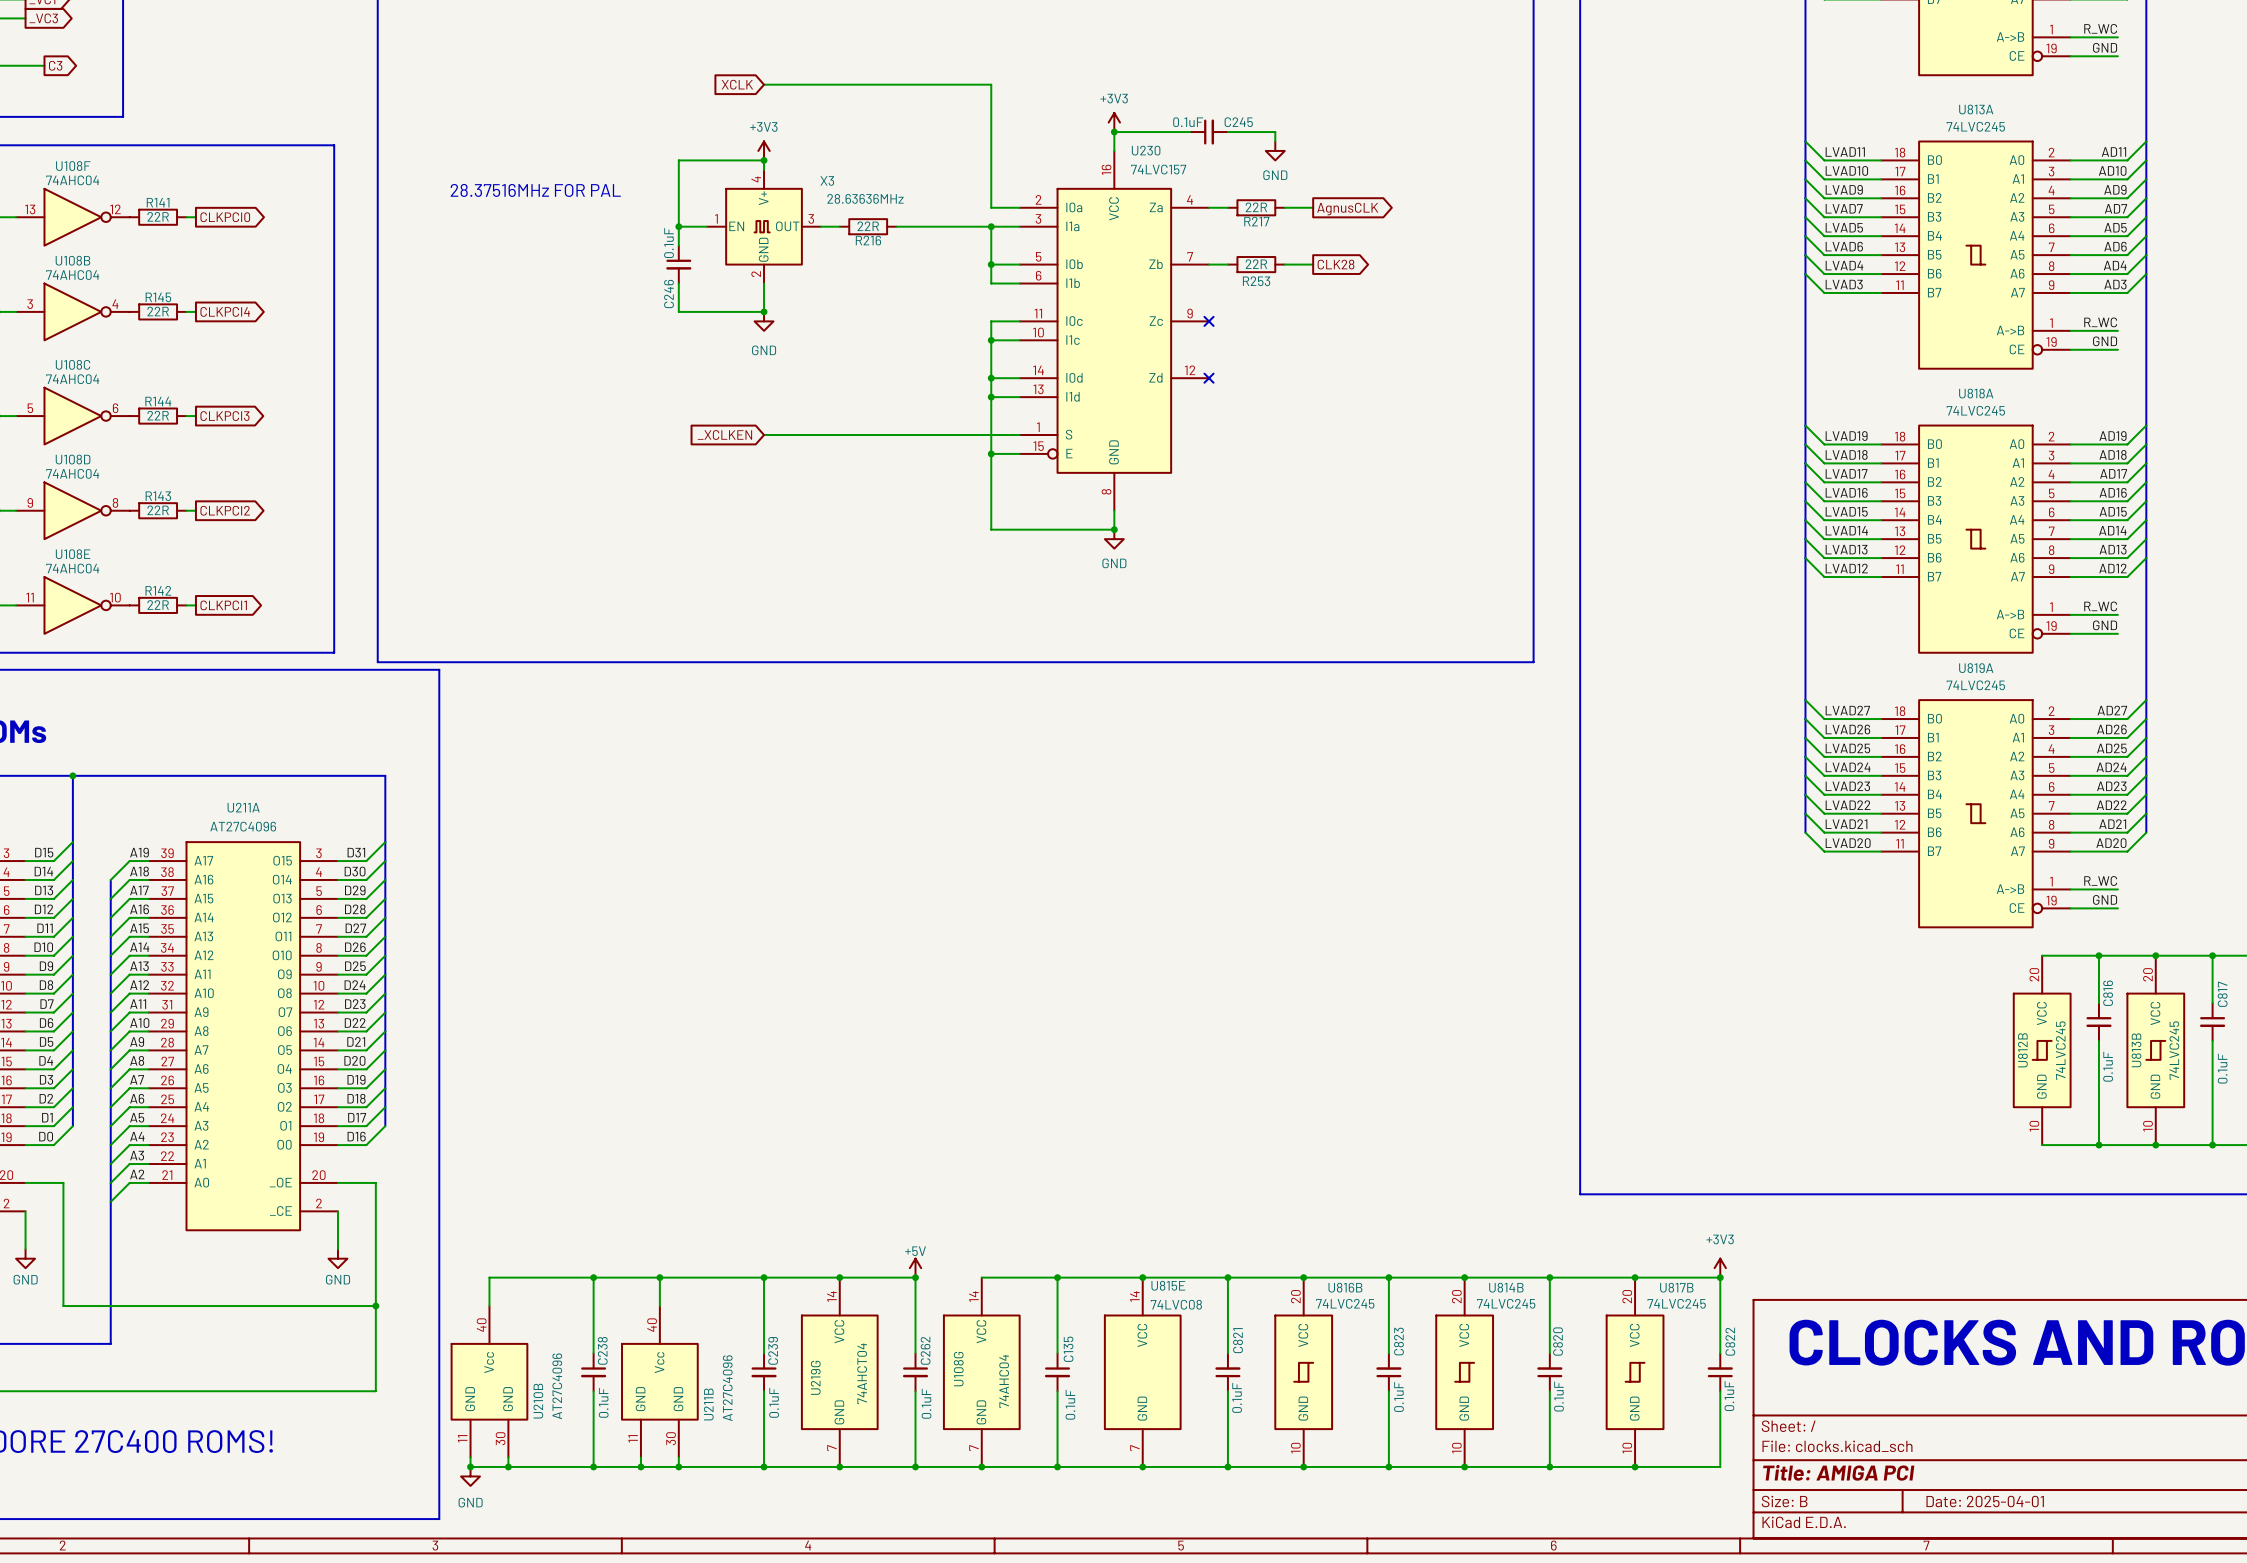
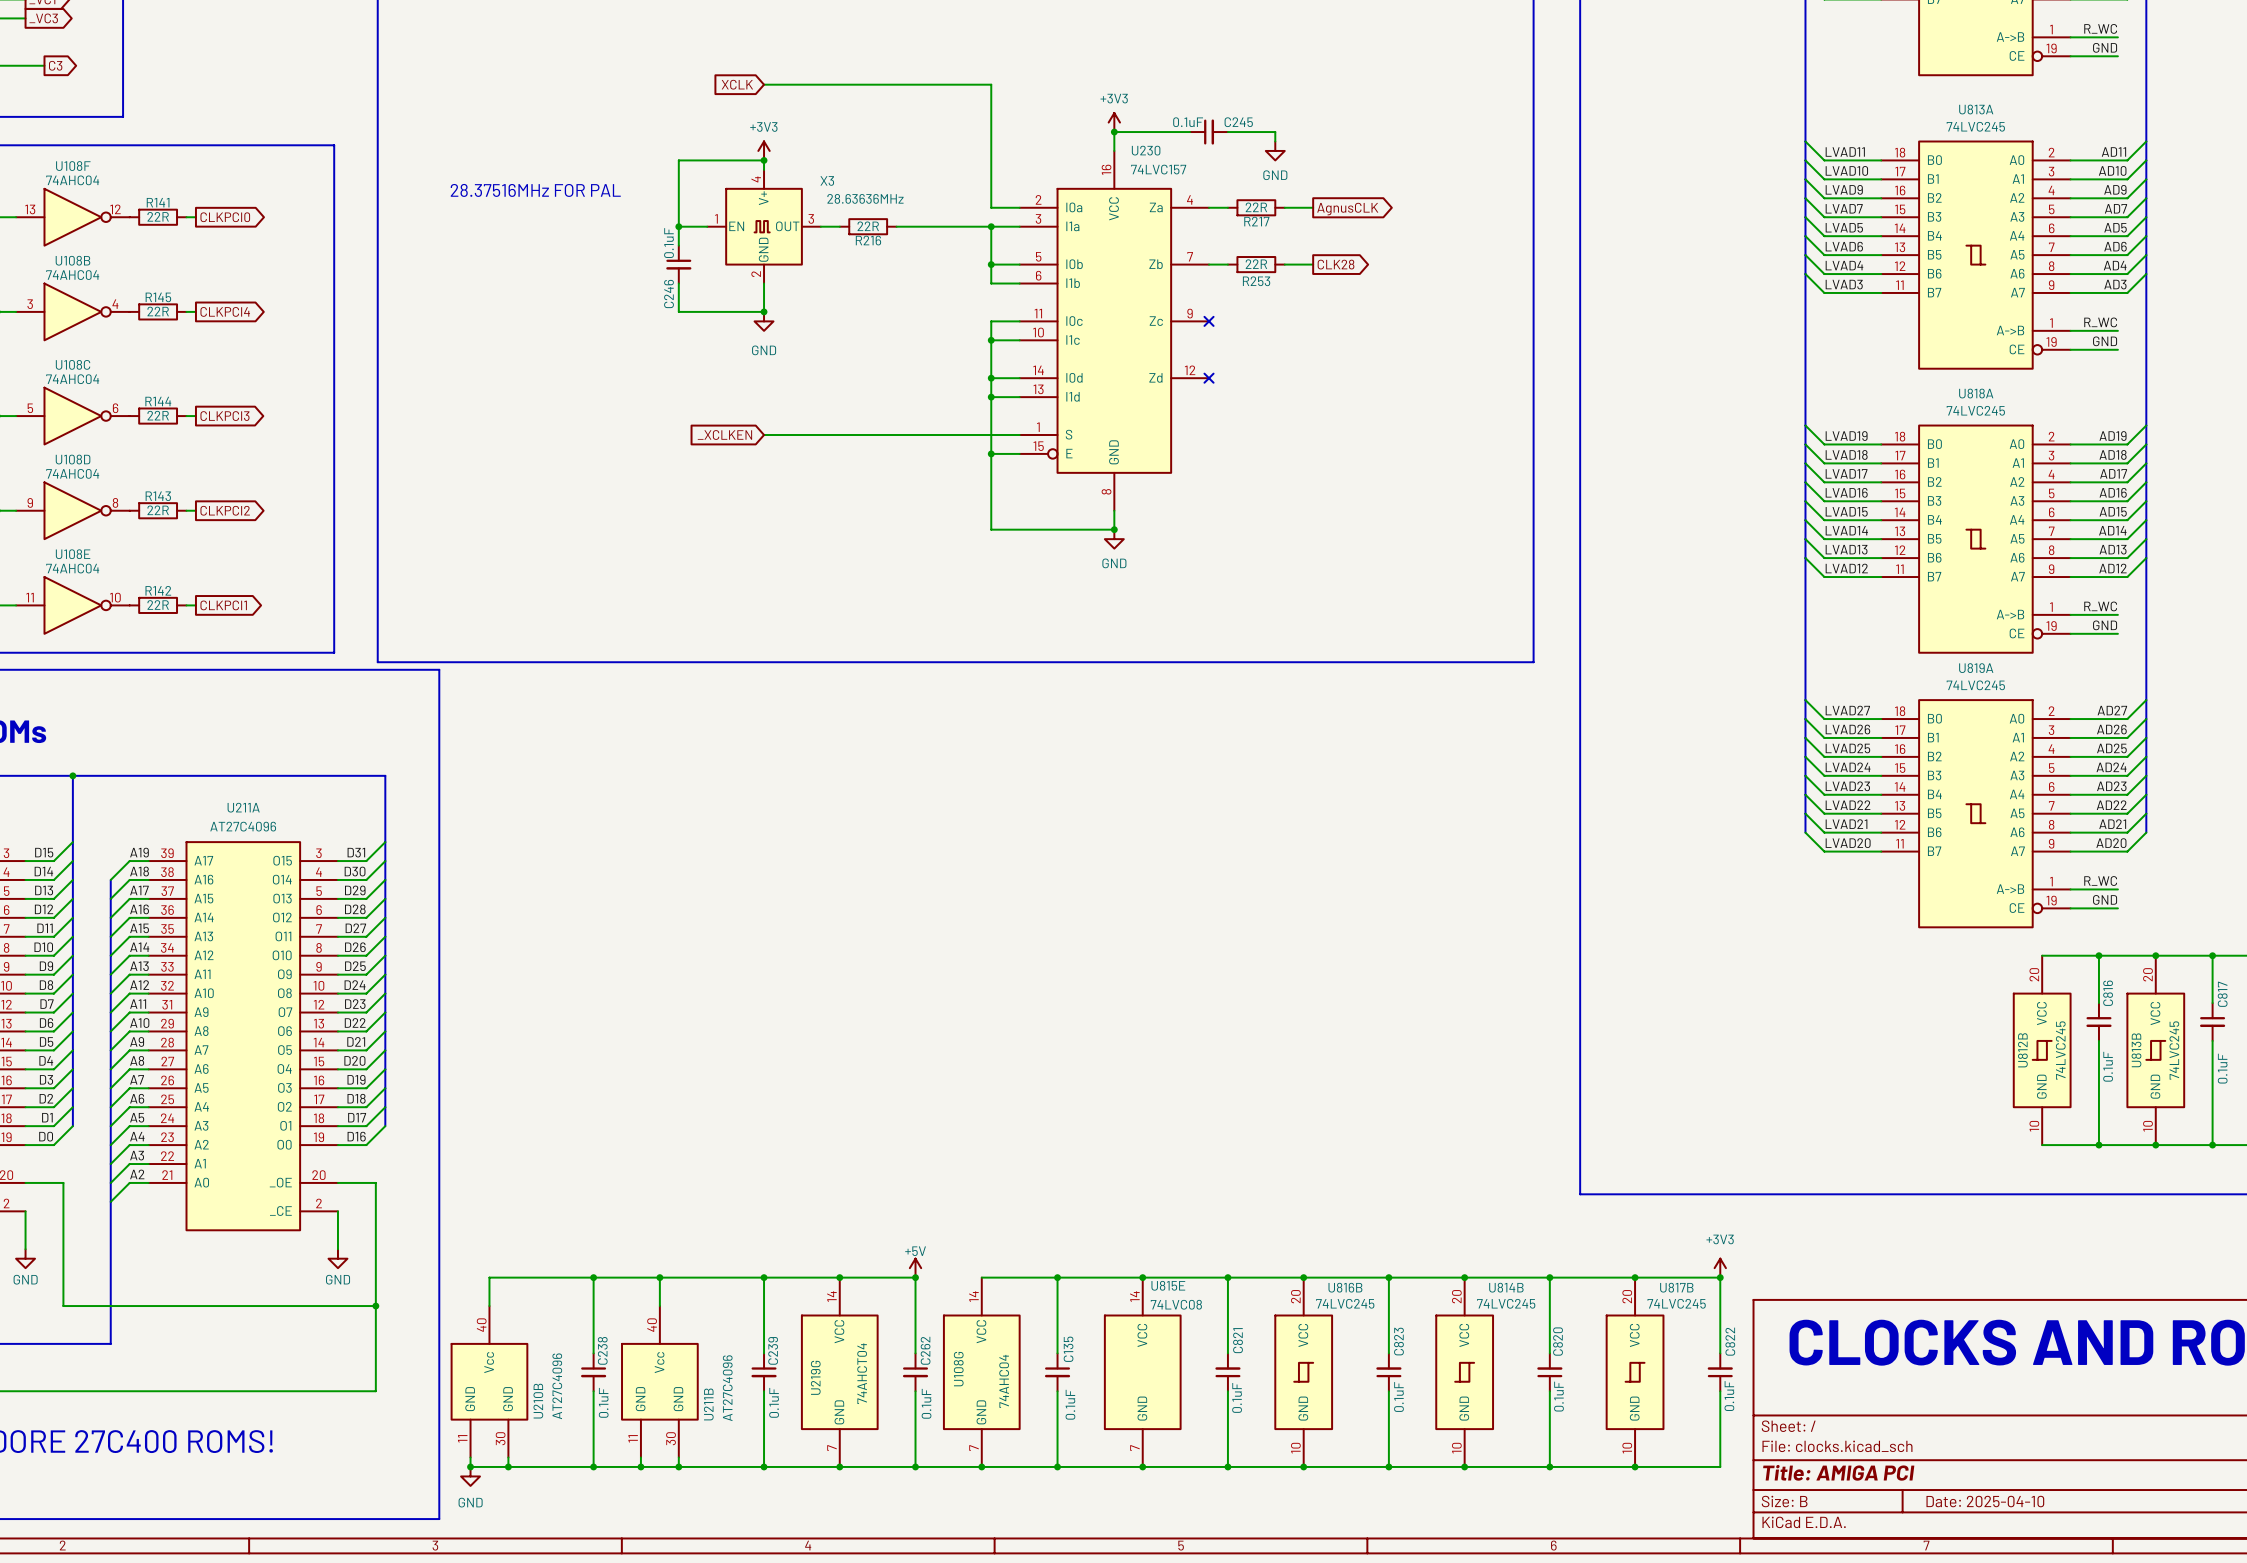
title block: Date: 2025-04-01 (1985, 1501) -> Date: 2025-04-10 (1985, 1501)

